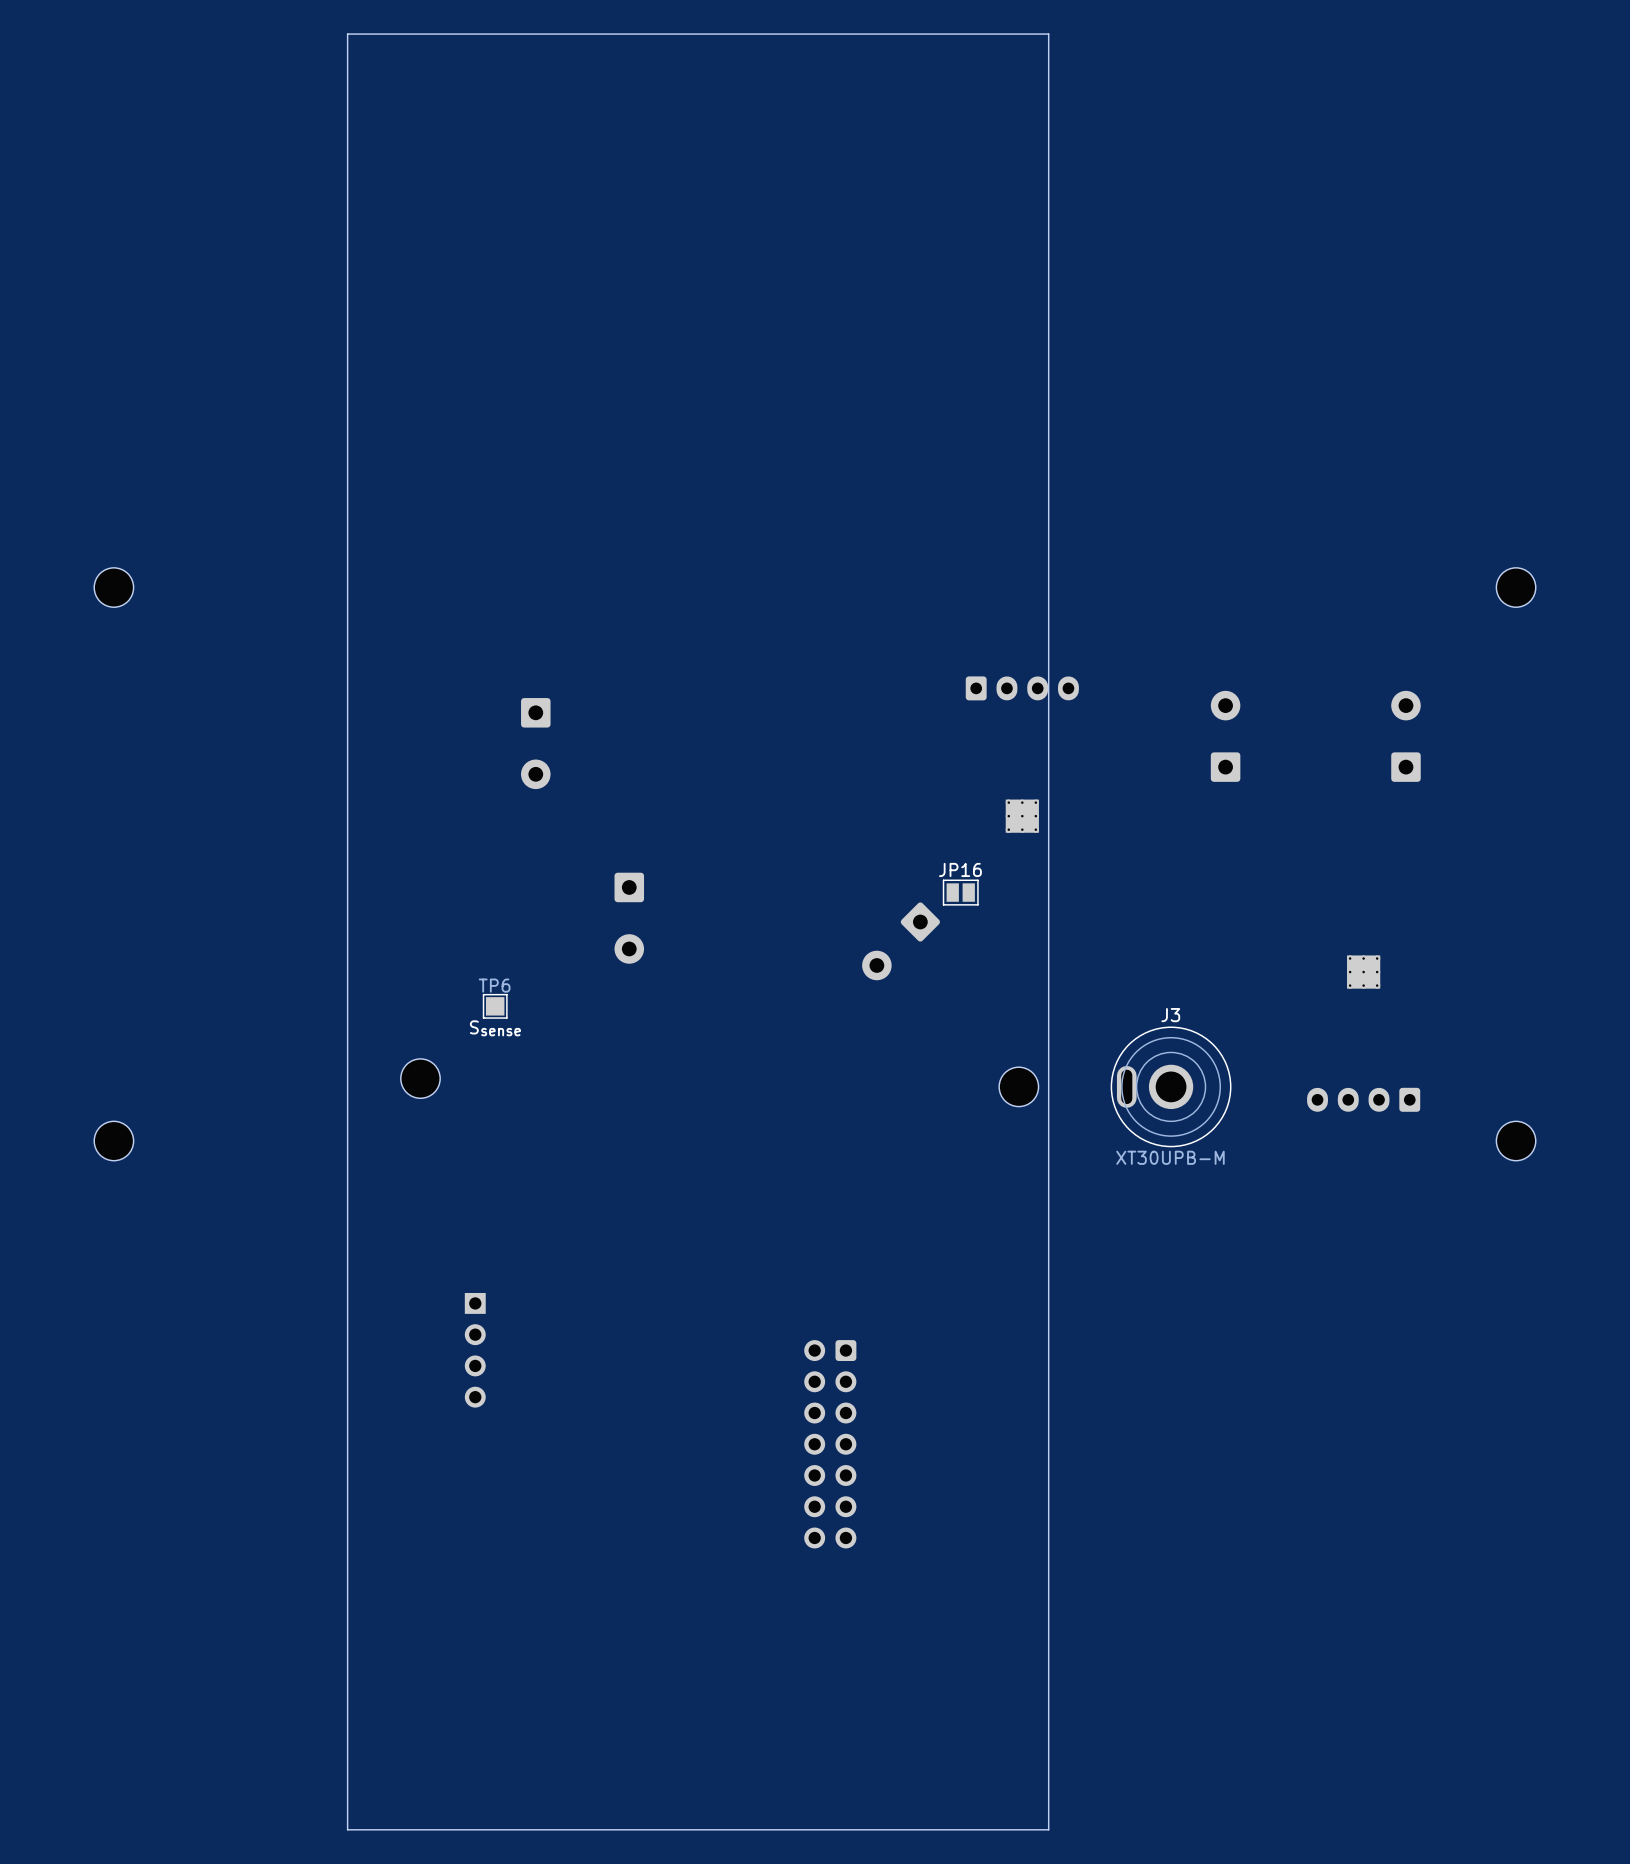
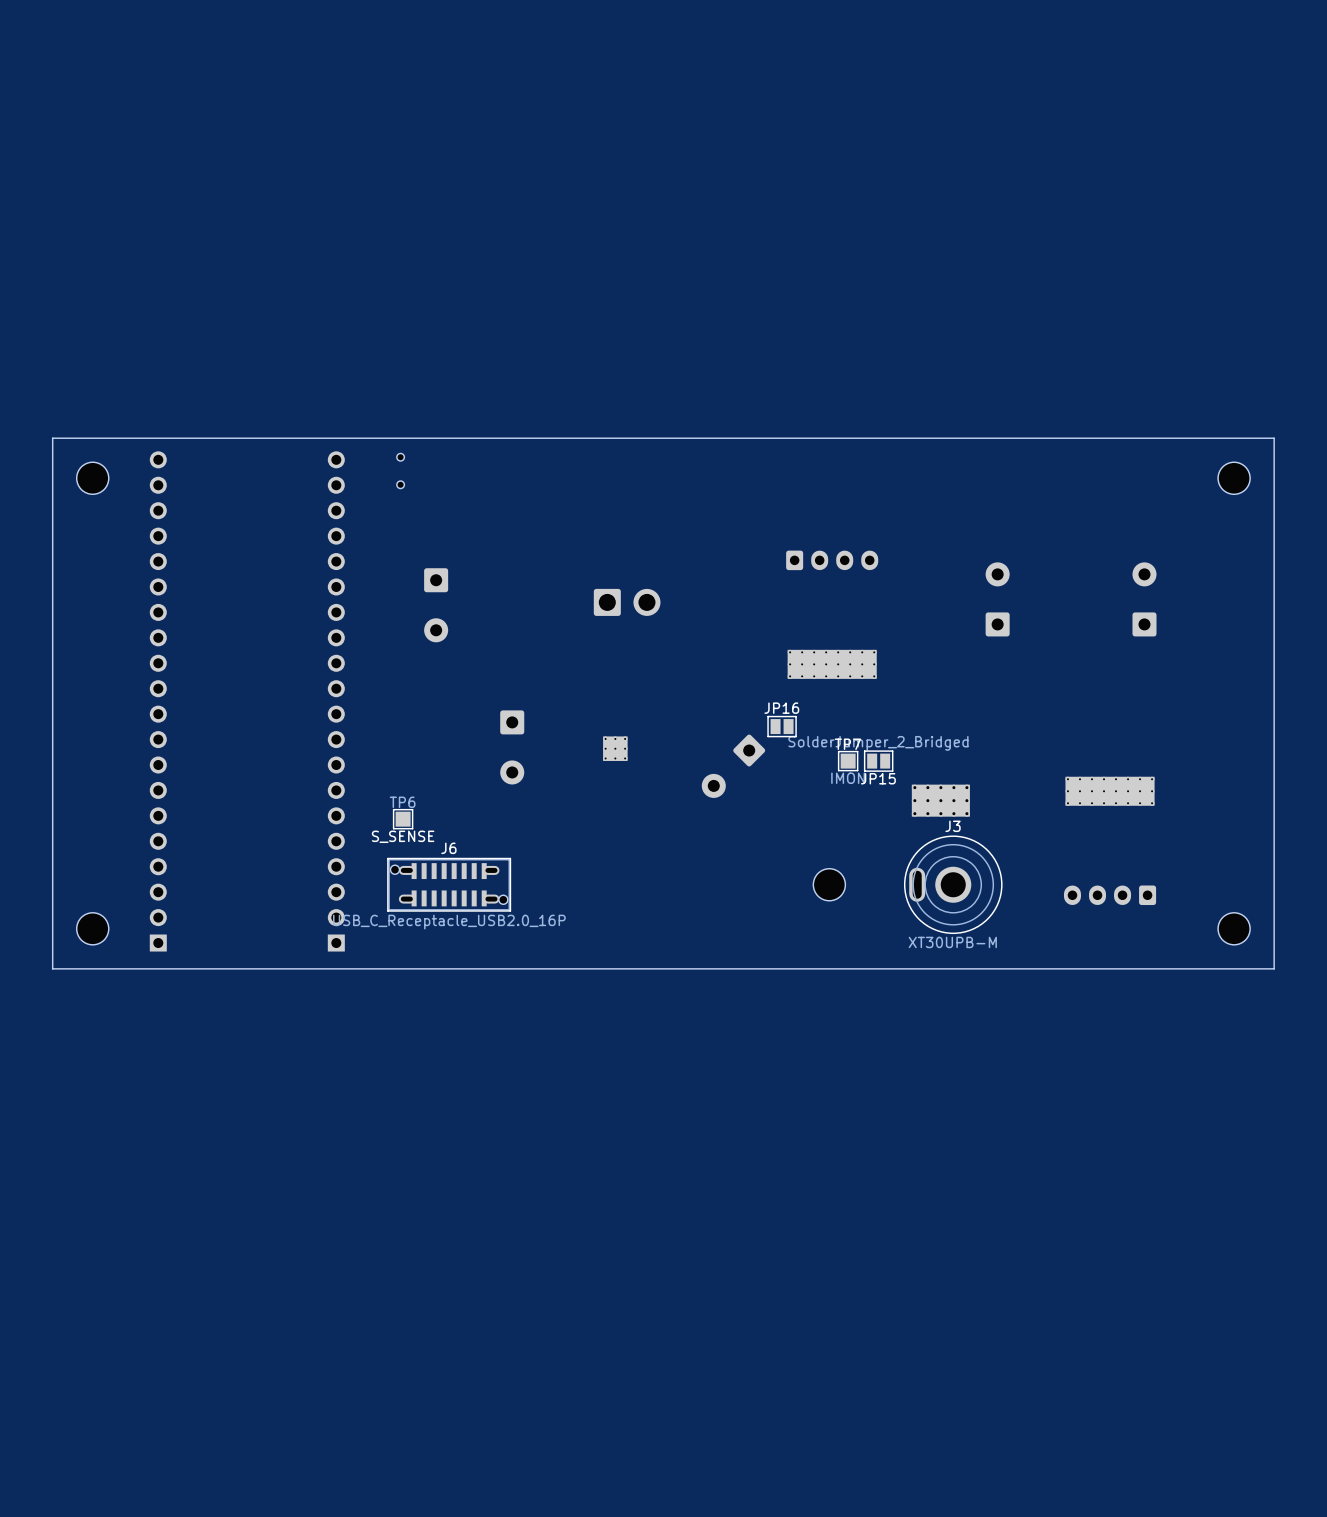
board edge: (1048, 34) (347, 34) (347, 1829) (1048, 1829) (1048, 34) -> none
board edge: none -> (1274, 438) (52, 438) (52, 968) (1274, 968) (1274, 438)
part: none -> (400, 471)
part: none -> (627, 602)
part footprint: [1005, 799, 1039, 833] -> [787, 649, 877, 679]
part: none -> (158, 701)
part: none -> (336, 701)
part: none -> (615, 748)
TP7: none -> IMON (848, 761)
JP15: none -> SolderJumper_2_Bridged (878, 761)
part footprint: [1347, 955, 1381, 989] -> [1065, 776, 1155, 806]
part: none -> (940, 800)
TP6 value: Ssense (495, 1028) -> S_SENSE (403, 836)
part: (420, 1078) -> none
J6: none -> USB_C_Receptacle_USB2.0_16P (449, 884)
part: (475, 1350) -> none
part: (830, 1444) -> none

